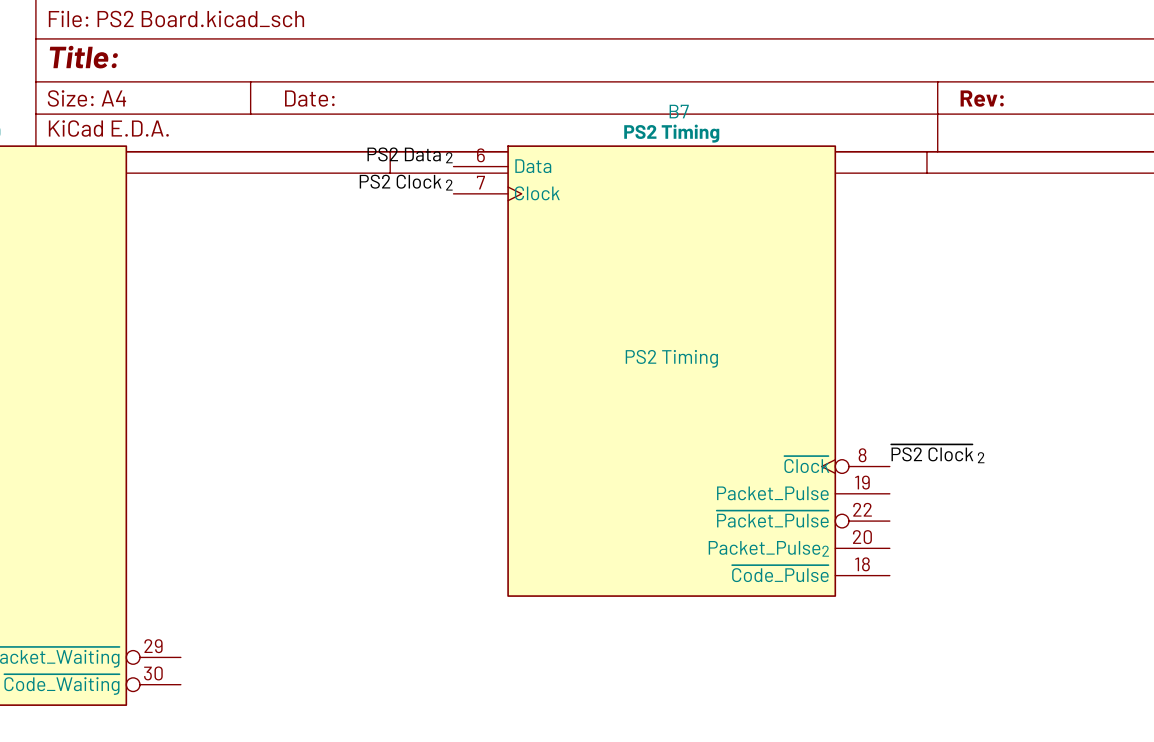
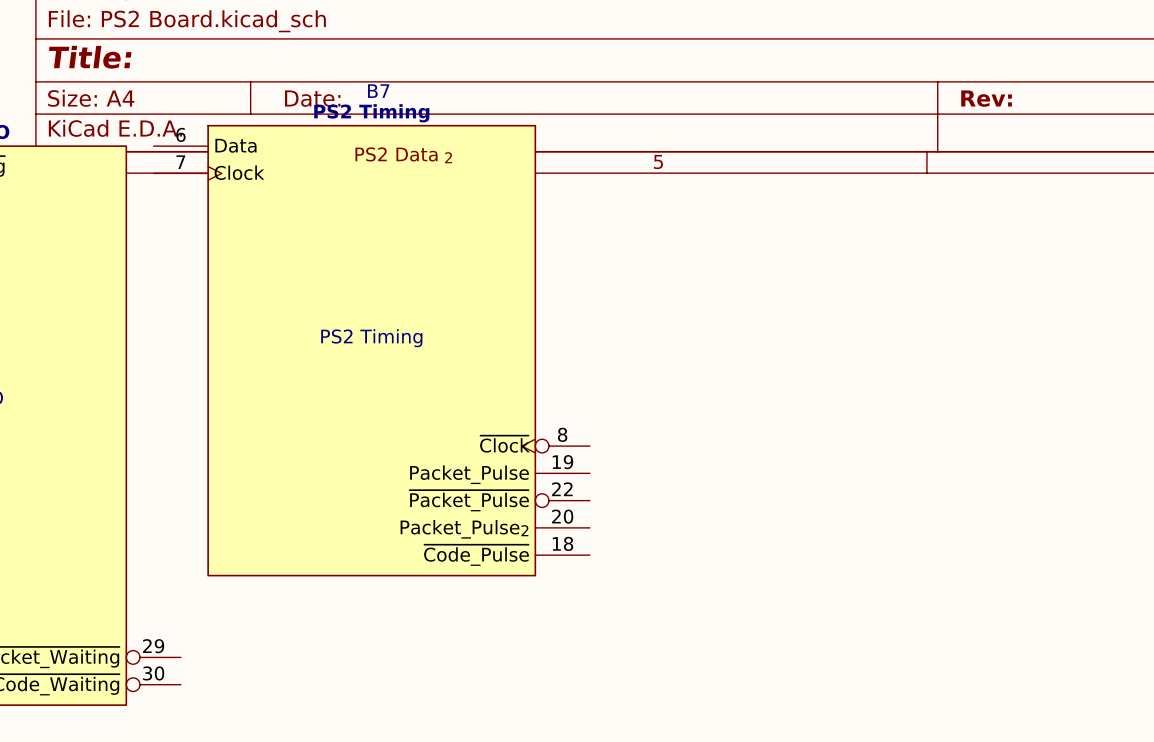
label: PS2 Clock 2 (406, 182) -> none
B7 position: (671, 371) -> (371, 350)
label: ~{PS2 Clock} 2 (937, 453) -> none

